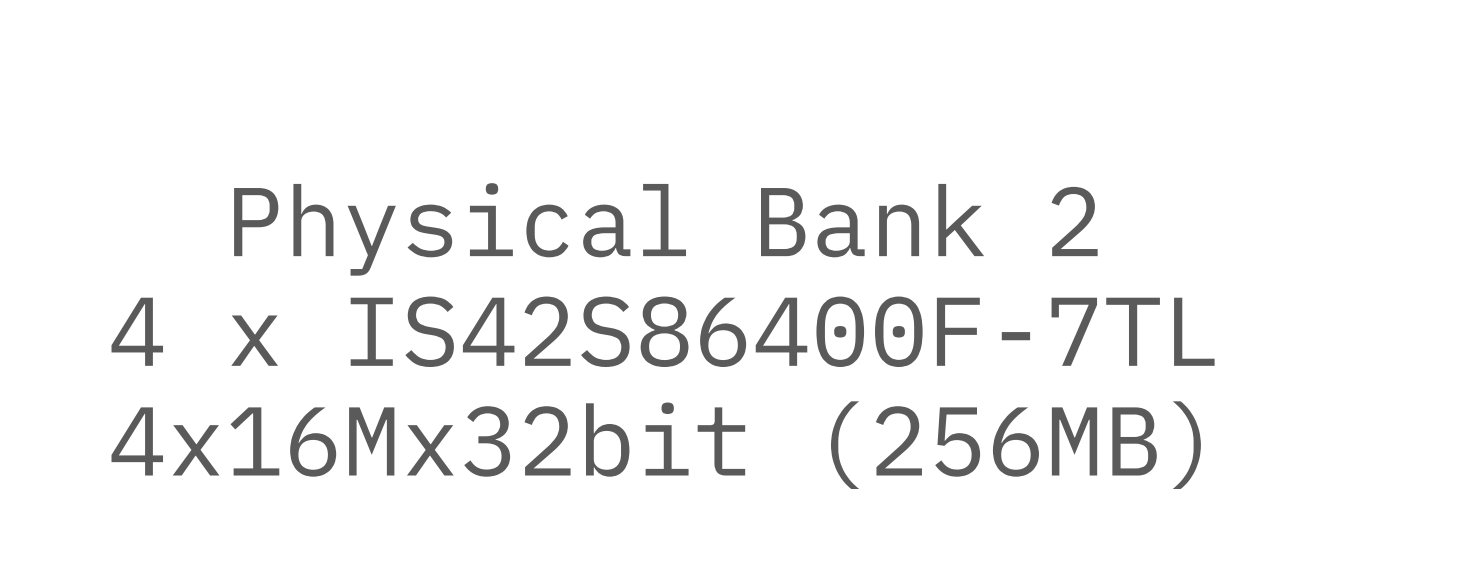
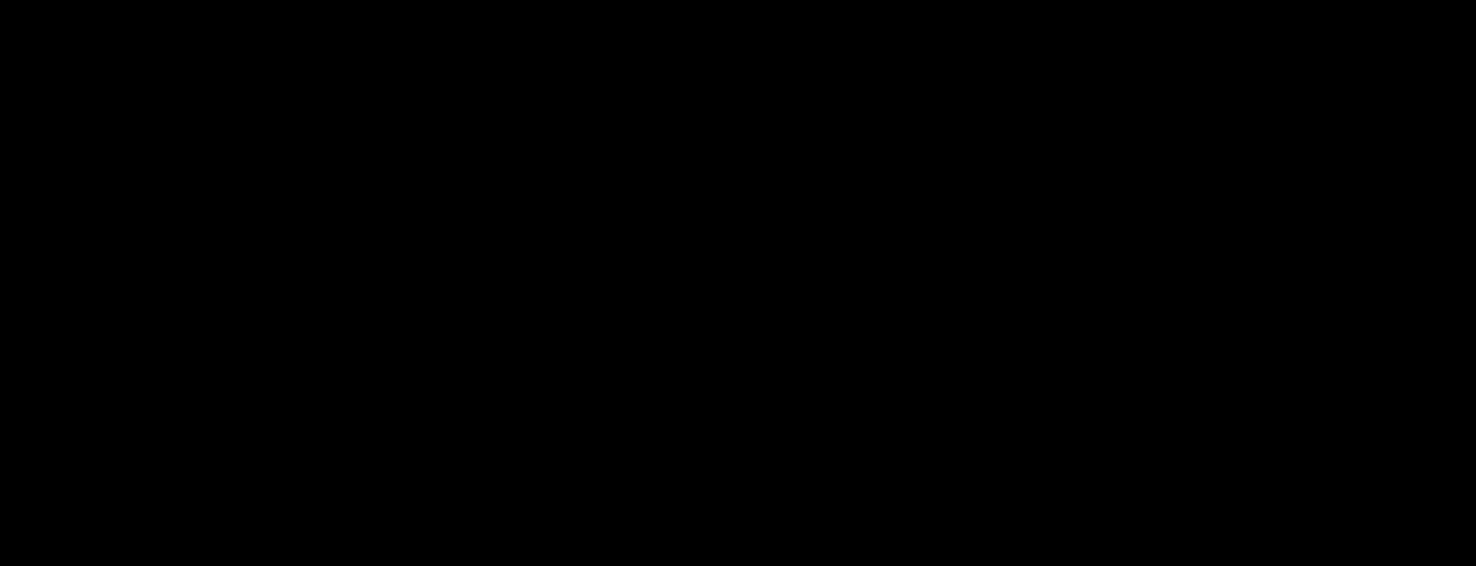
text: Physical Bank 2 (665, 229) -> none
text: 4 x IS42S86400F-7TL (663, 331) -> none
text: 4x16Mx32bit (256MB) (656, 445) -> none

